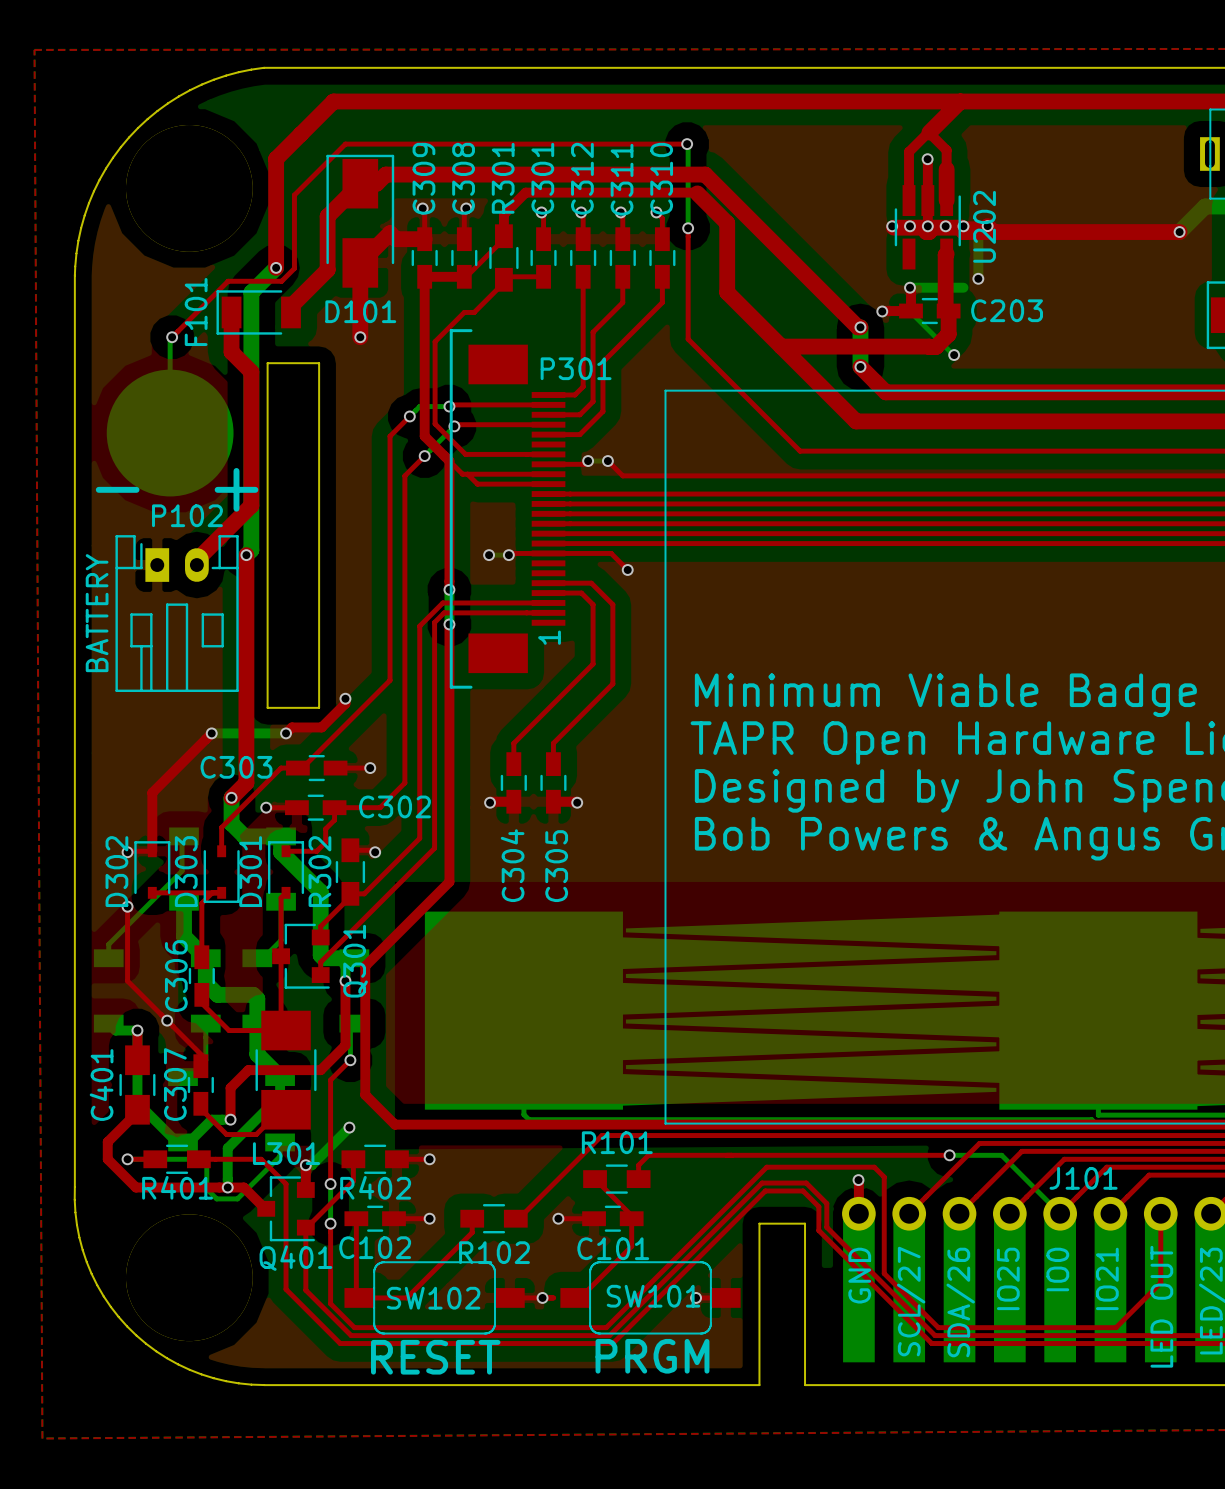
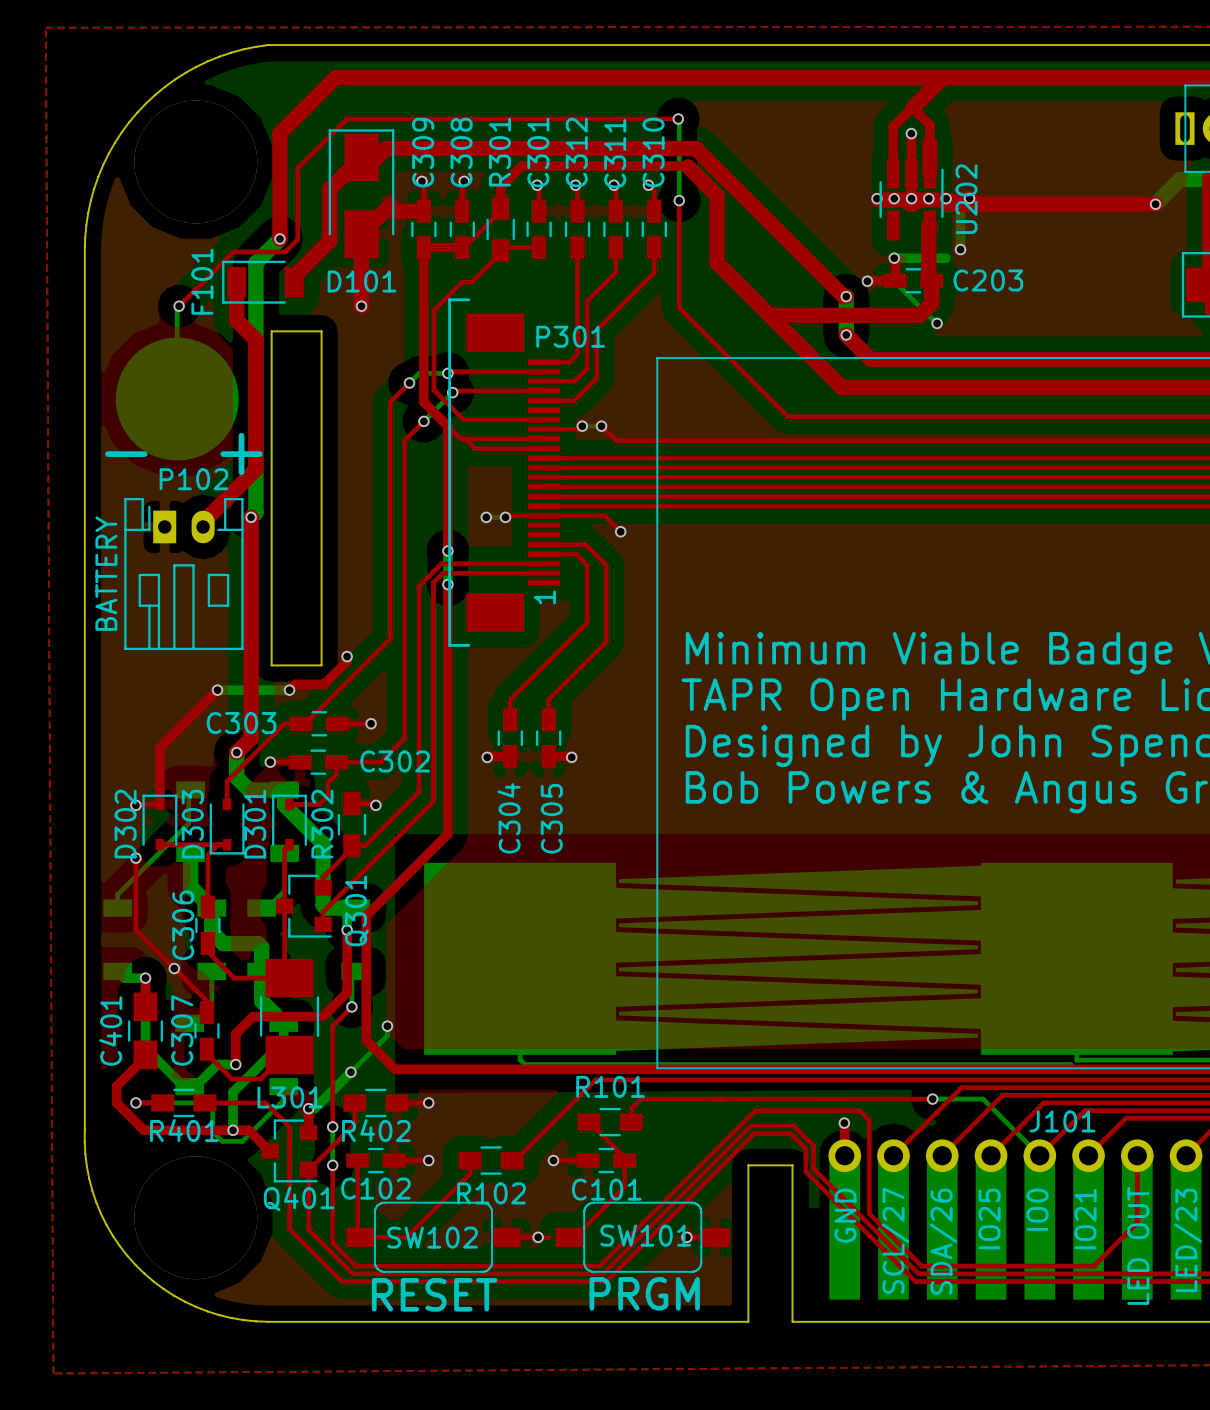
bottom track: none -> (387, 1026) (387, 1035) (350, 1072)
via: none -> (387, 1026)

